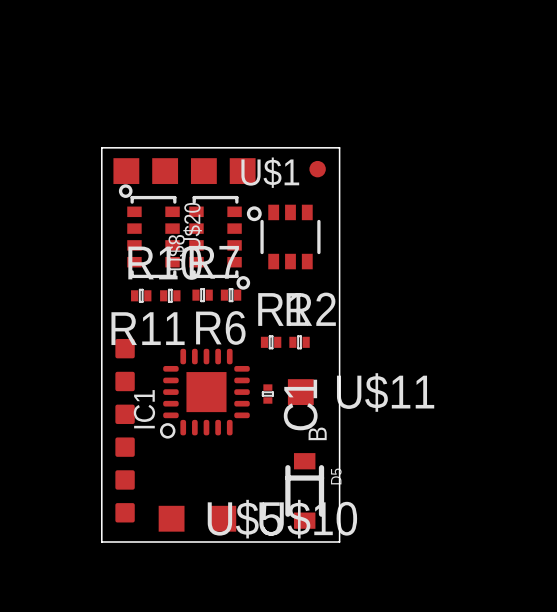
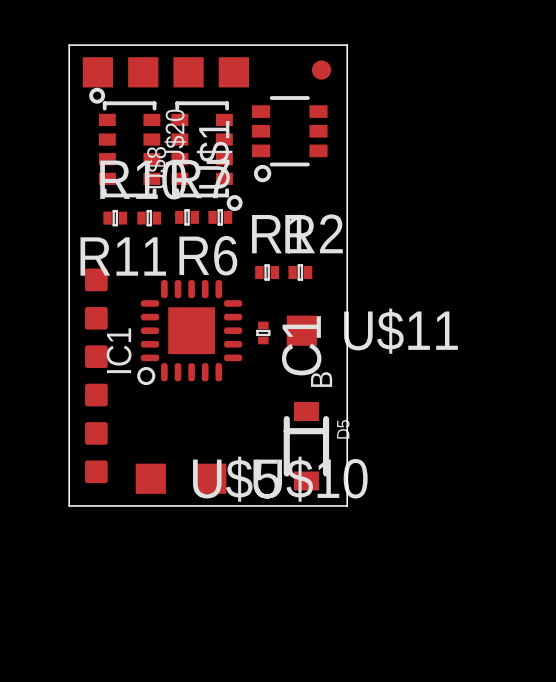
U$1 rotation: 0° (283, 237) -> 90° counterclockwise (289, 139)

